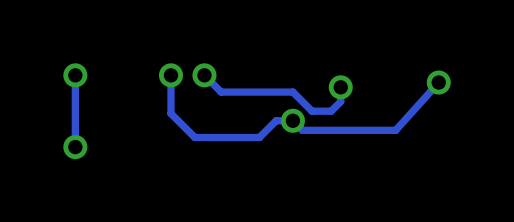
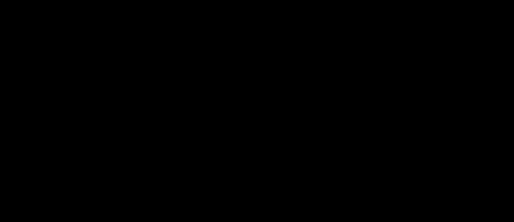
track: (75, 75) (75, 147) -> none
via: (75, 75) -> none
track: (170, 75) (170, 113) (194, 137) (259, 137) (276, 120) (292, 120) (302, 130) (395, 130) (438, 82) -> none
via: (170, 75) -> none
track: (204, 75) (221, 92) (292, 92) (312, 111) (331, 111) (340, 101) (340, 87) -> none
via: (204, 75) -> none
via: (438, 82) -> none
via: (340, 87) -> none
via: (292, 120) -> none
via: (75, 147) -> none

